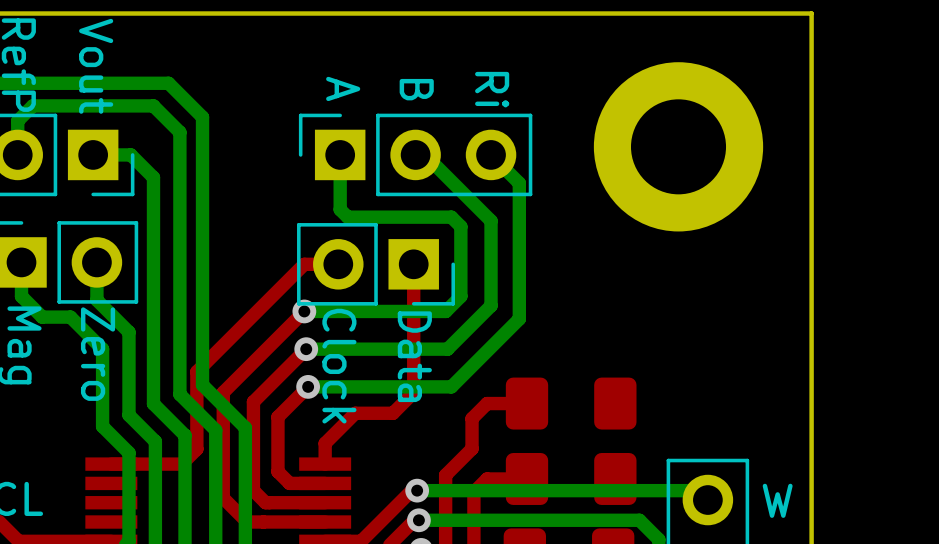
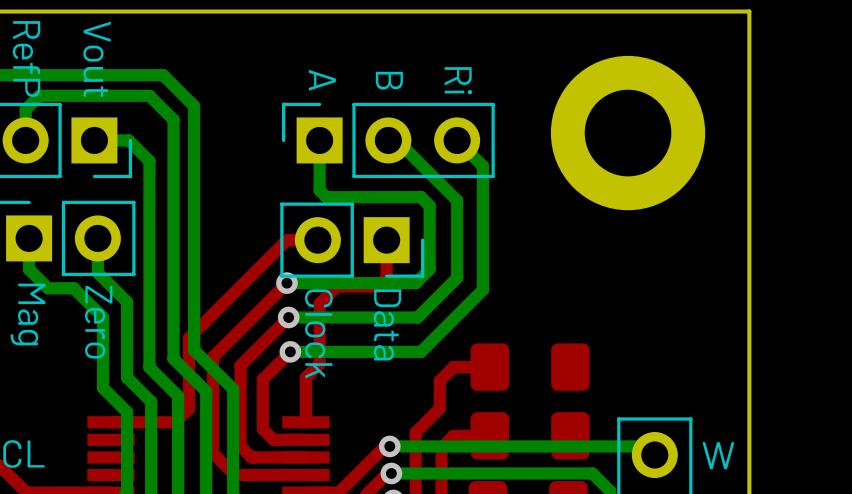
top track: (413, 305) (413, 392) (392, 413) (355, 413) (325, 443) -> (386, 277) (378, 286) (336, 286) (319, 303) (319, 363) (305, 377) (305, 403)

